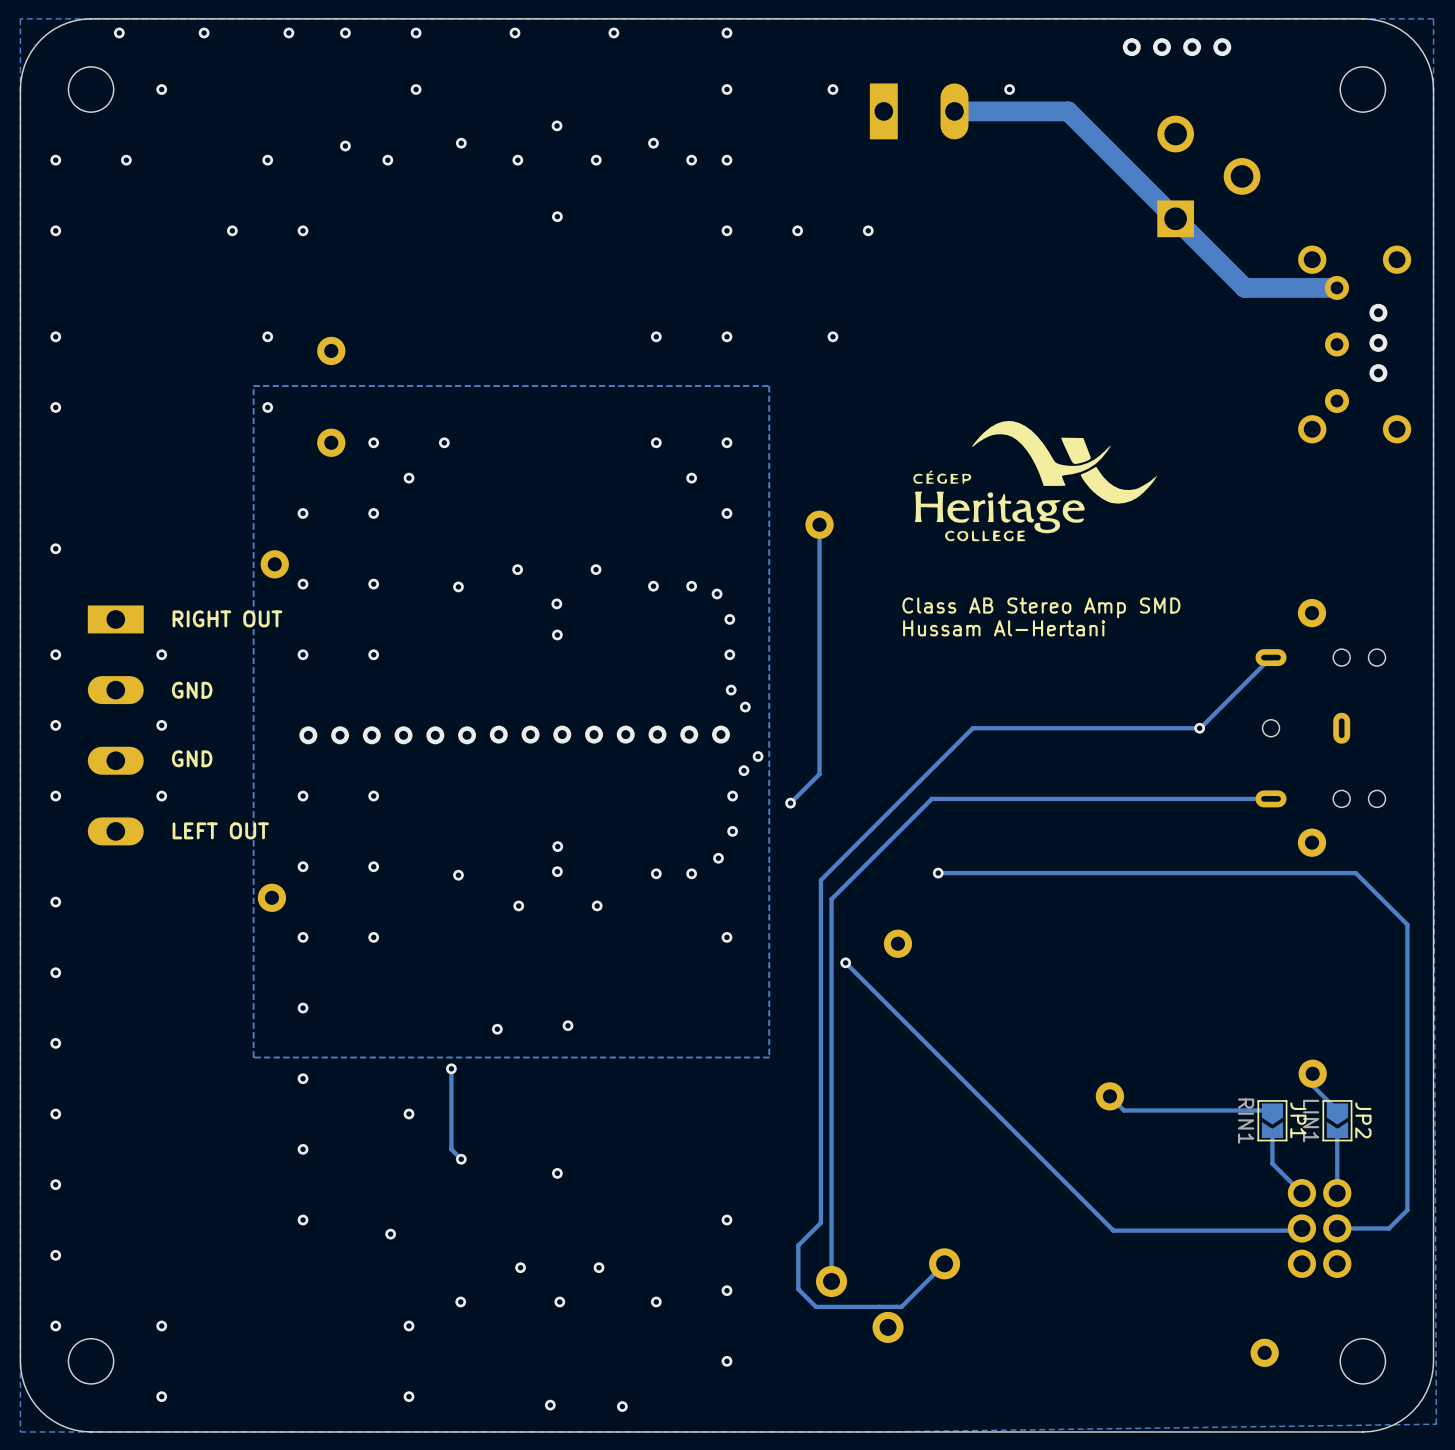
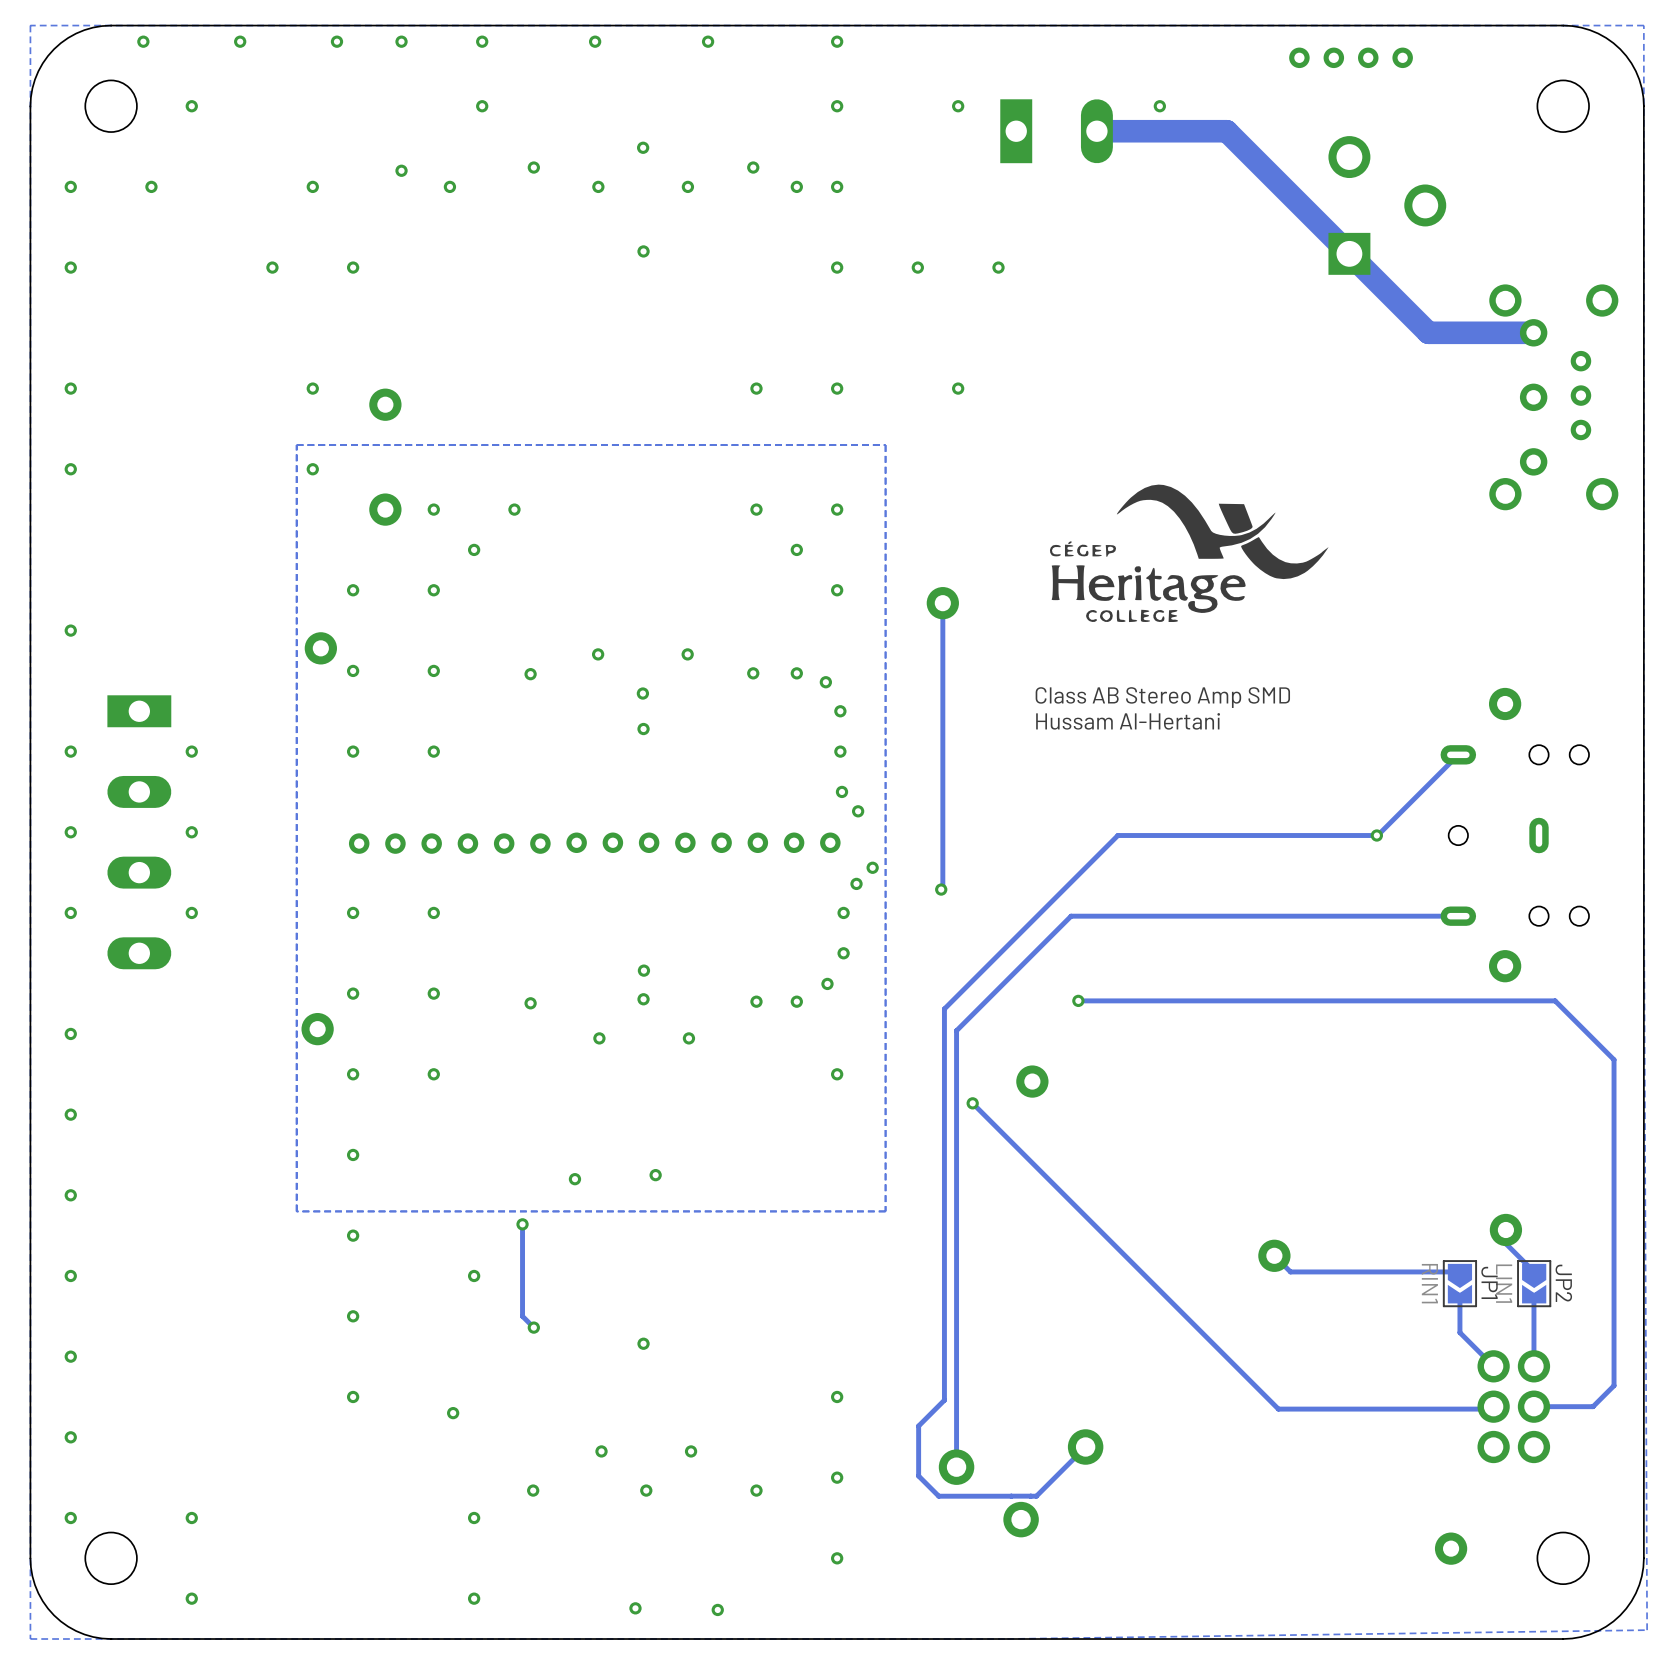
text: RIGHT OUT (227, 618) -> none
text: GND (192, 690) -> none
text: GND (192, 758) -> none
track: (818, 775) (790, 803) -> none
via position: (790, 803) -> (941, 889)
text: LEFT OUT (220, 830) -> none

